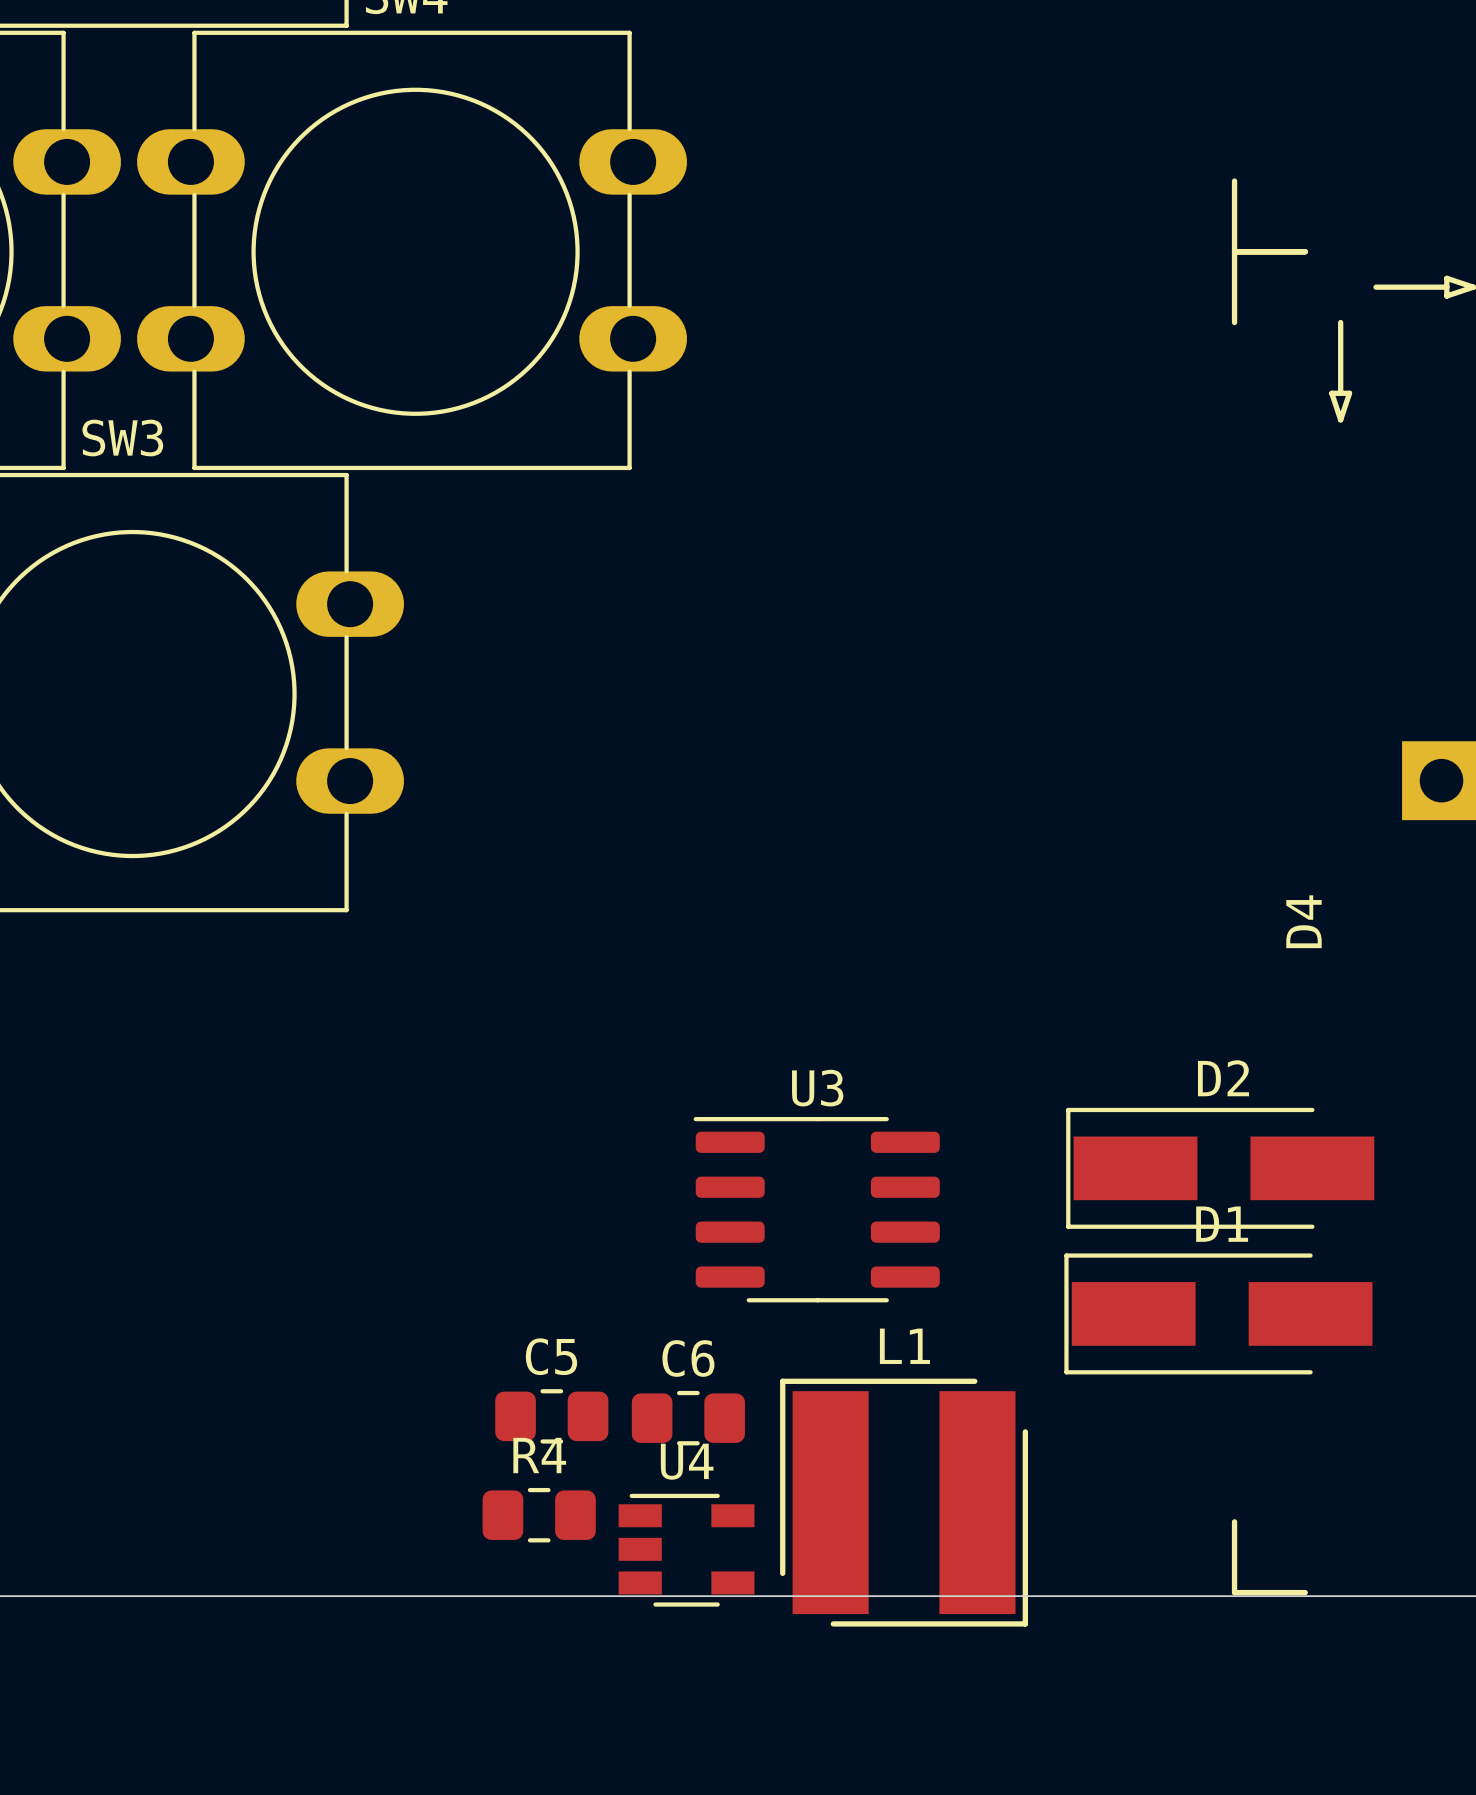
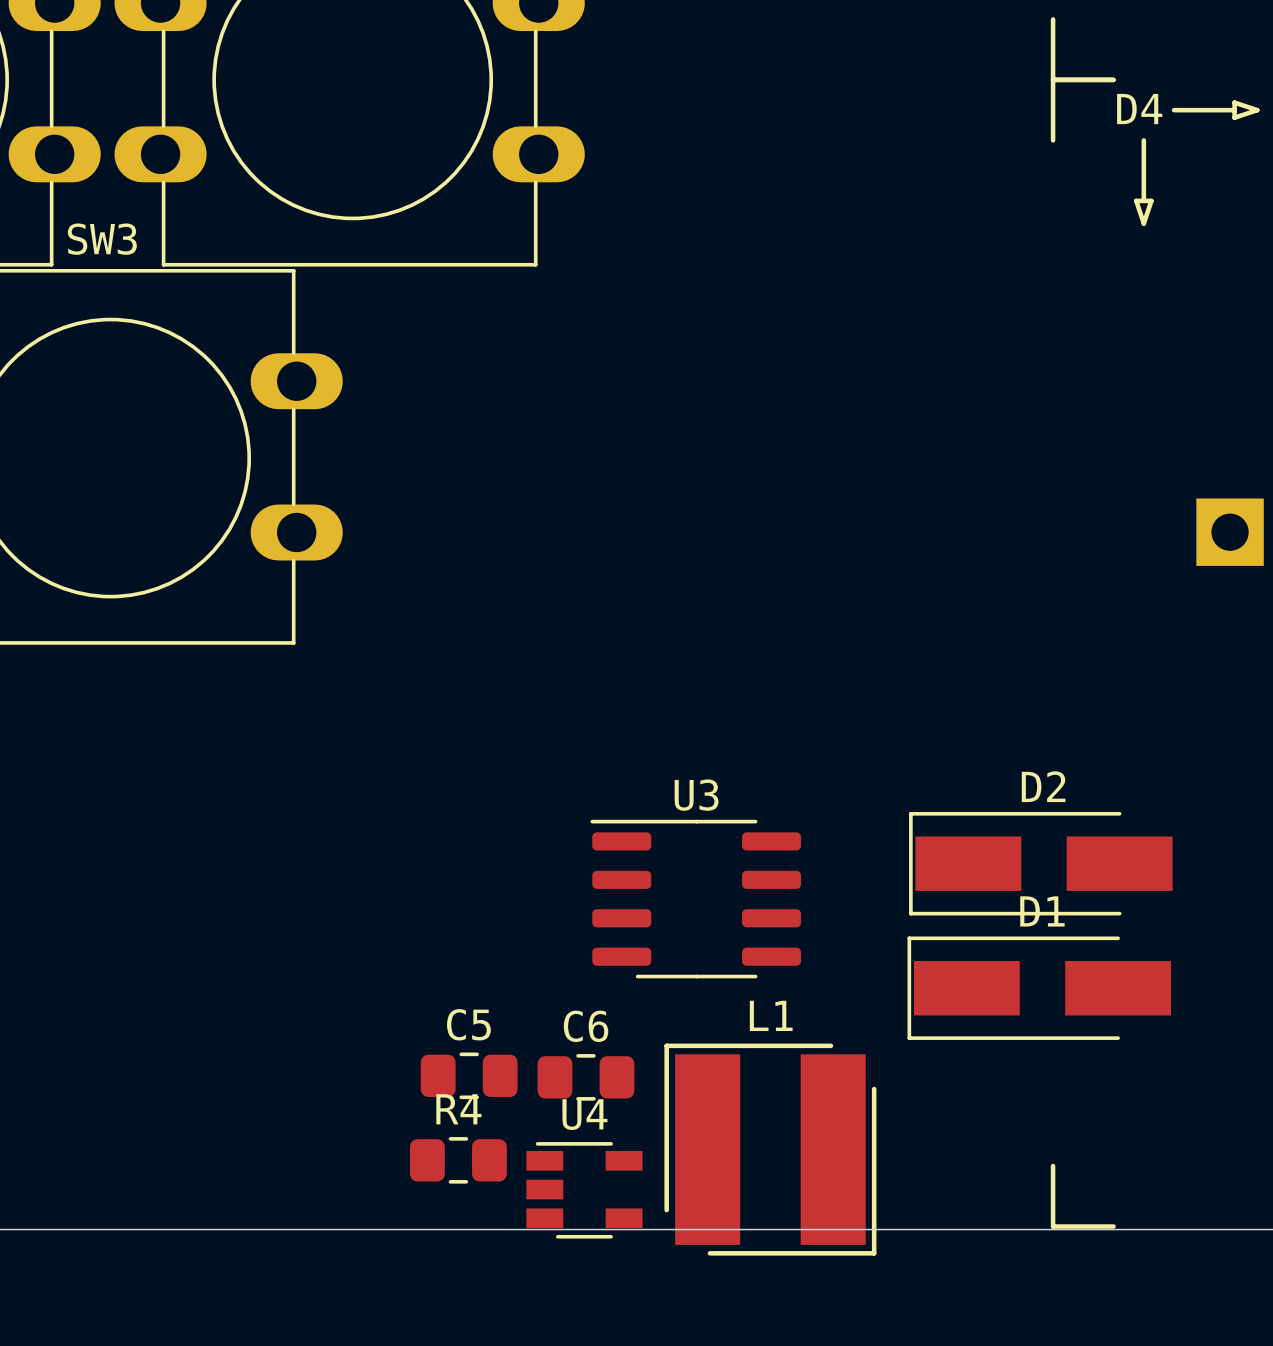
D4 name rotation: 0° (1303, 921) -> 90° clockwise (1139, 109)
D4 name position: D4 (1303, 921) -> D4 (1139, 109)

